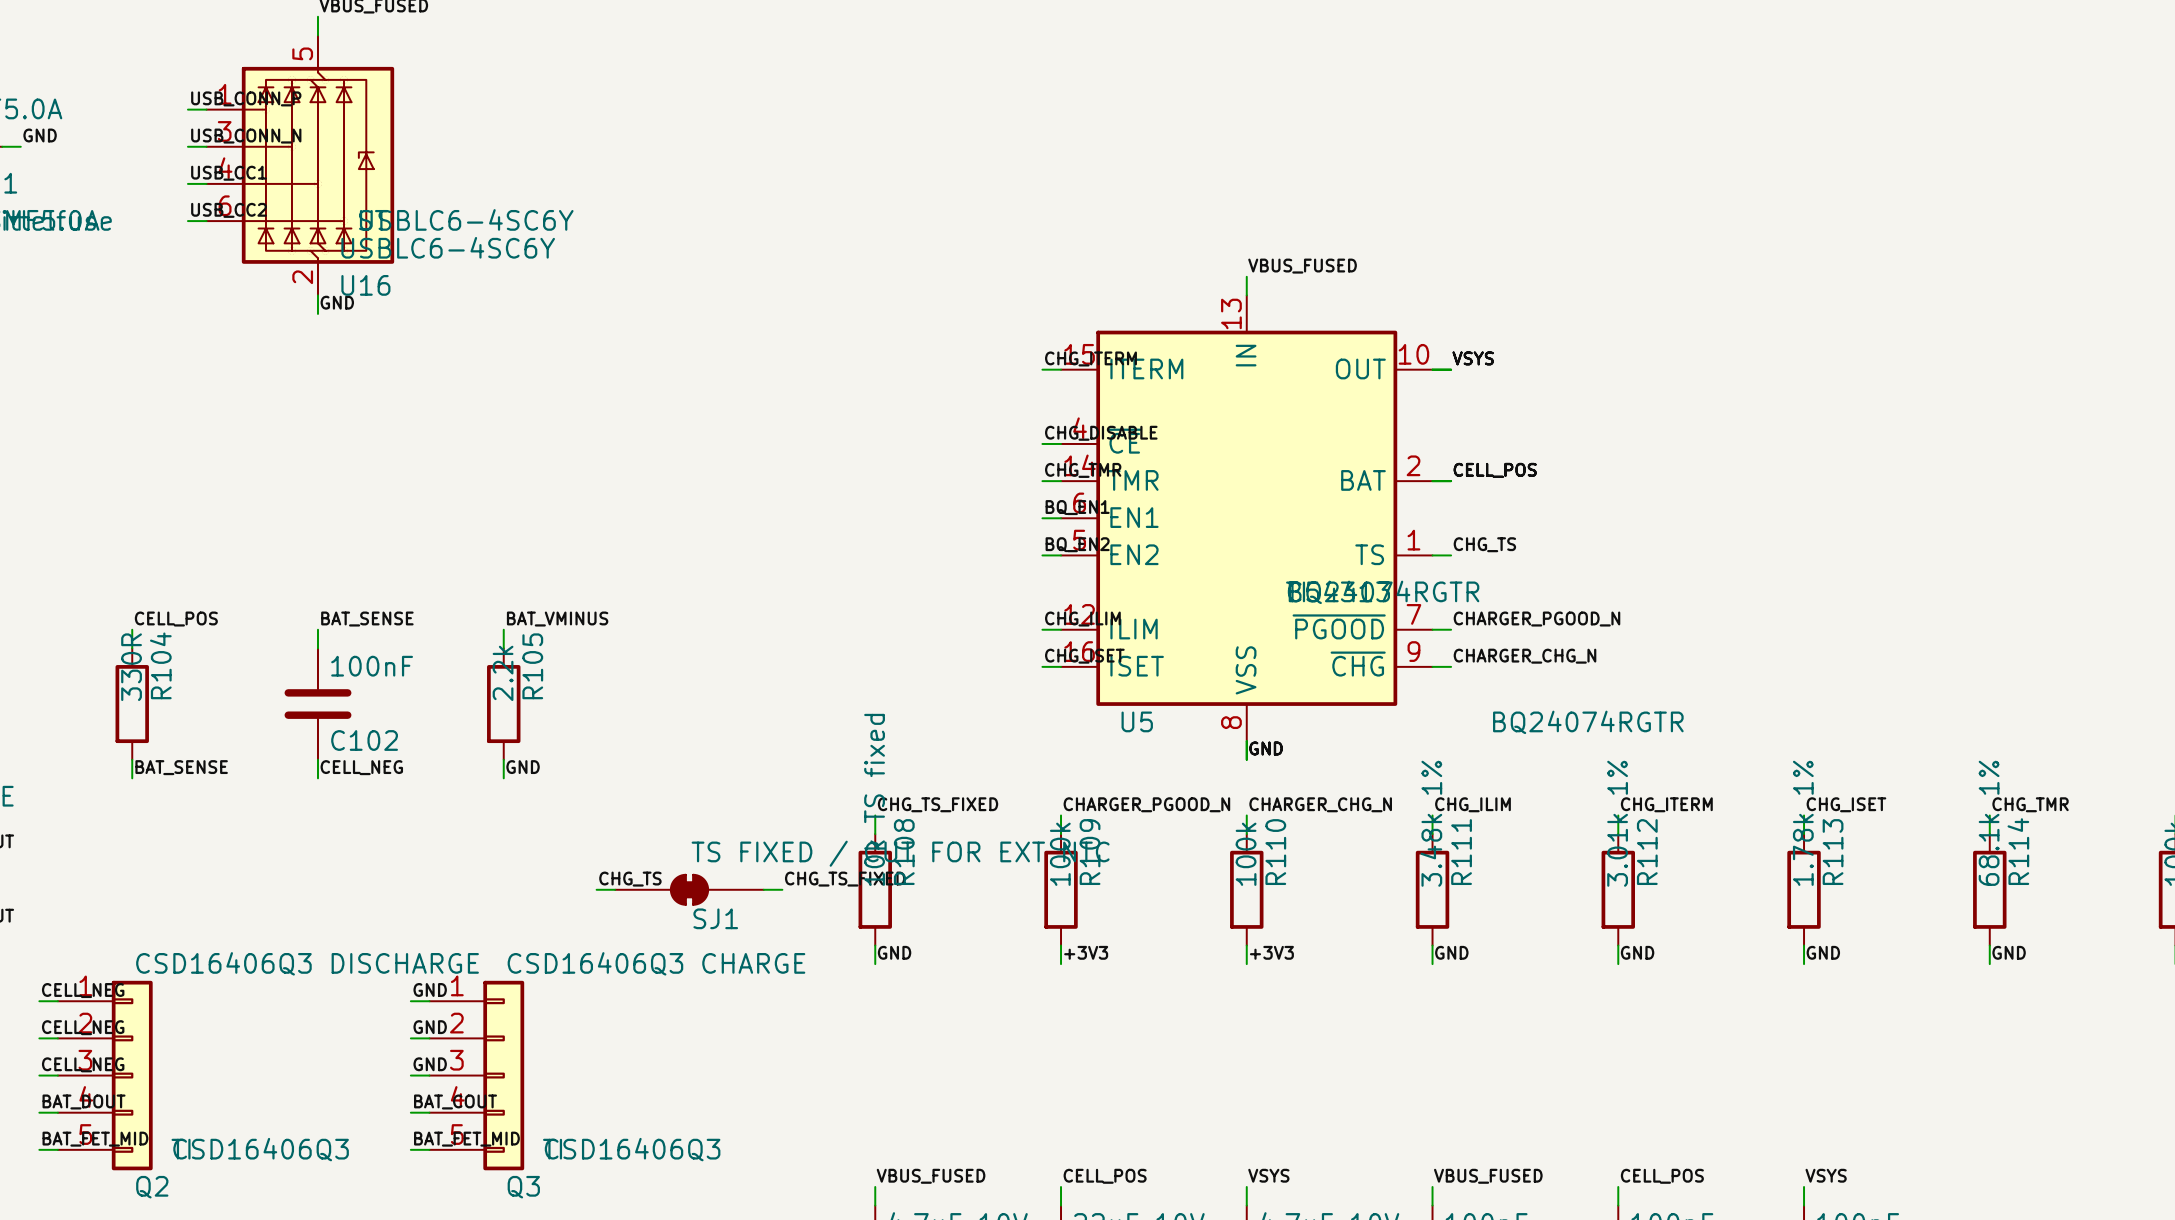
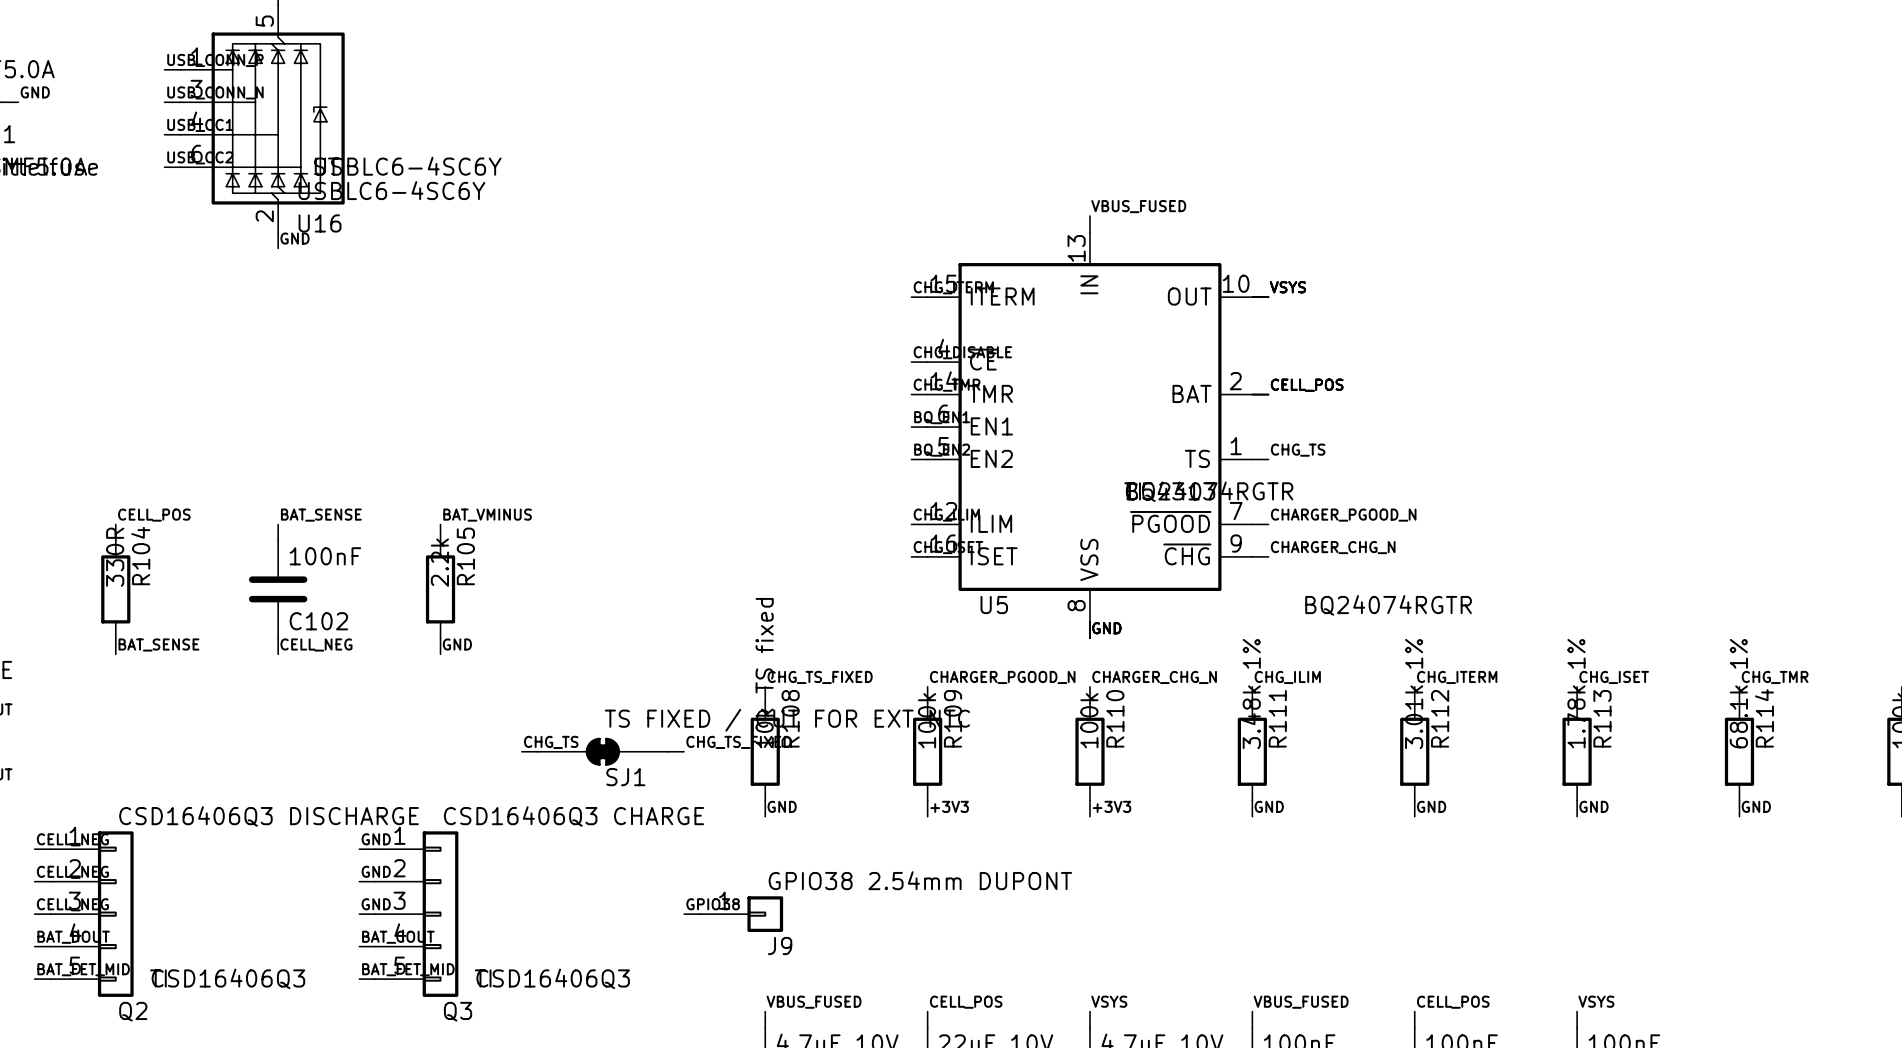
label: none -> GPIO38 (713, 904)
wire: none -> (684, 914) (700, 914)
J9: none -> GPIO38 2.54mm DUPONT (741, 914)

